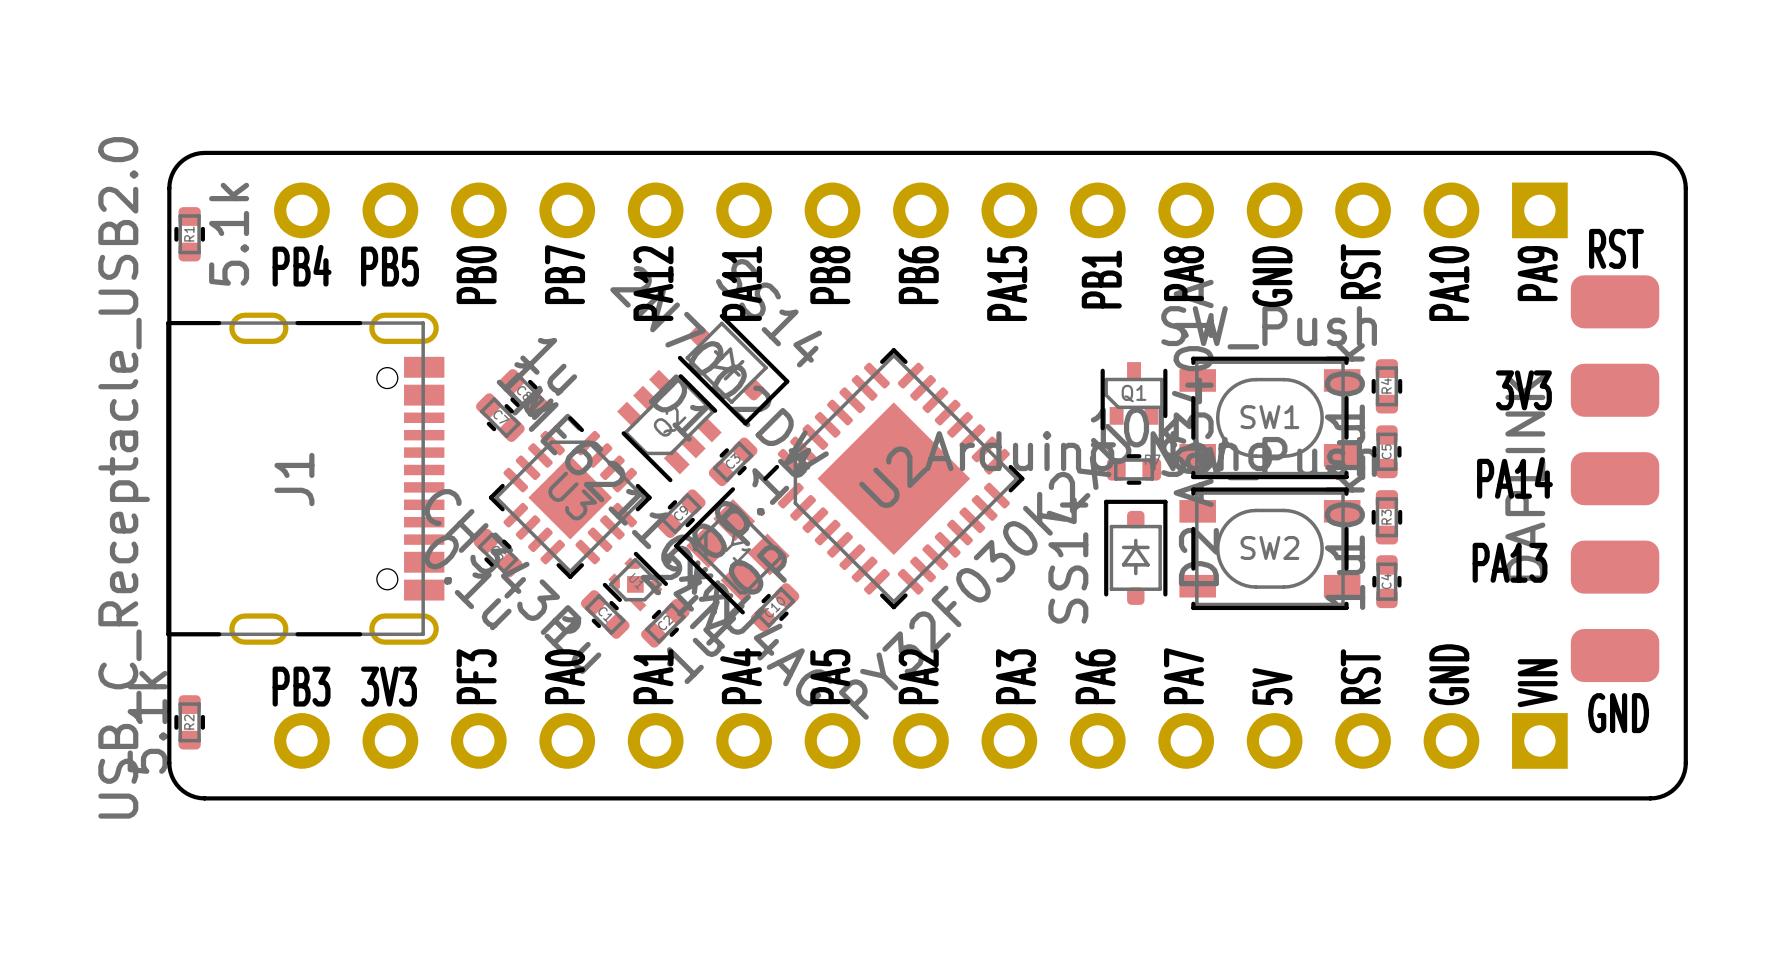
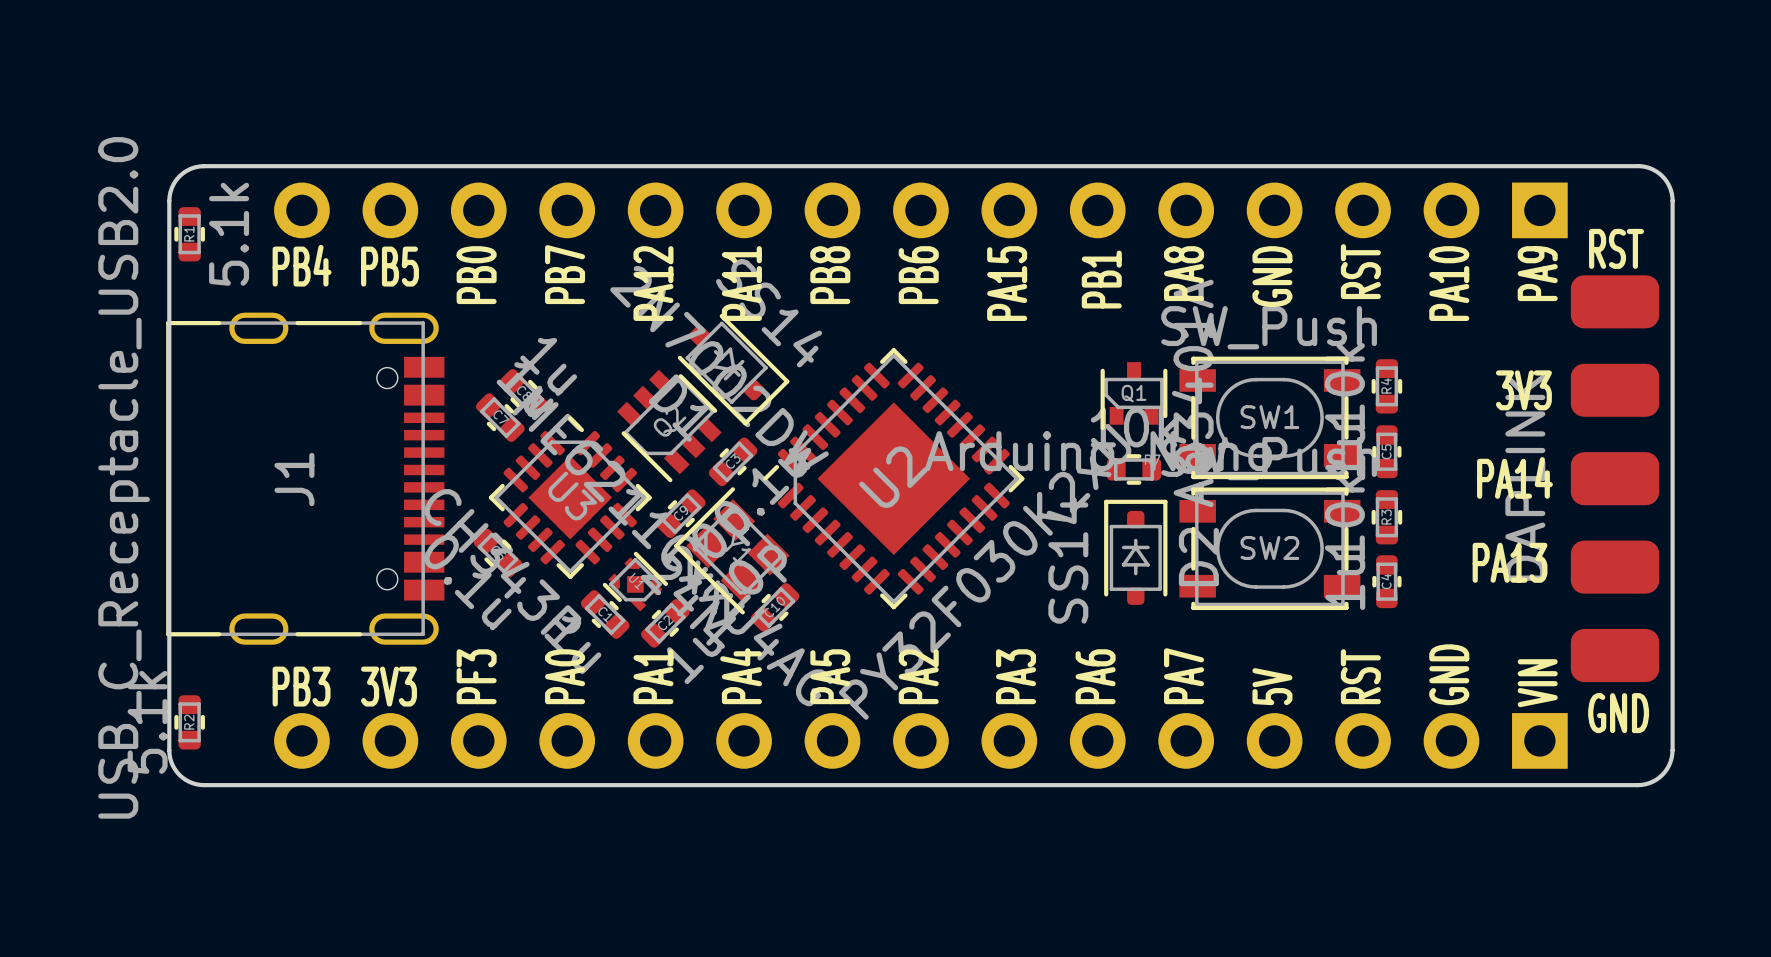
part footprint: [167, 150, 1688, 801] -> [167, 163, 1675, 788]

